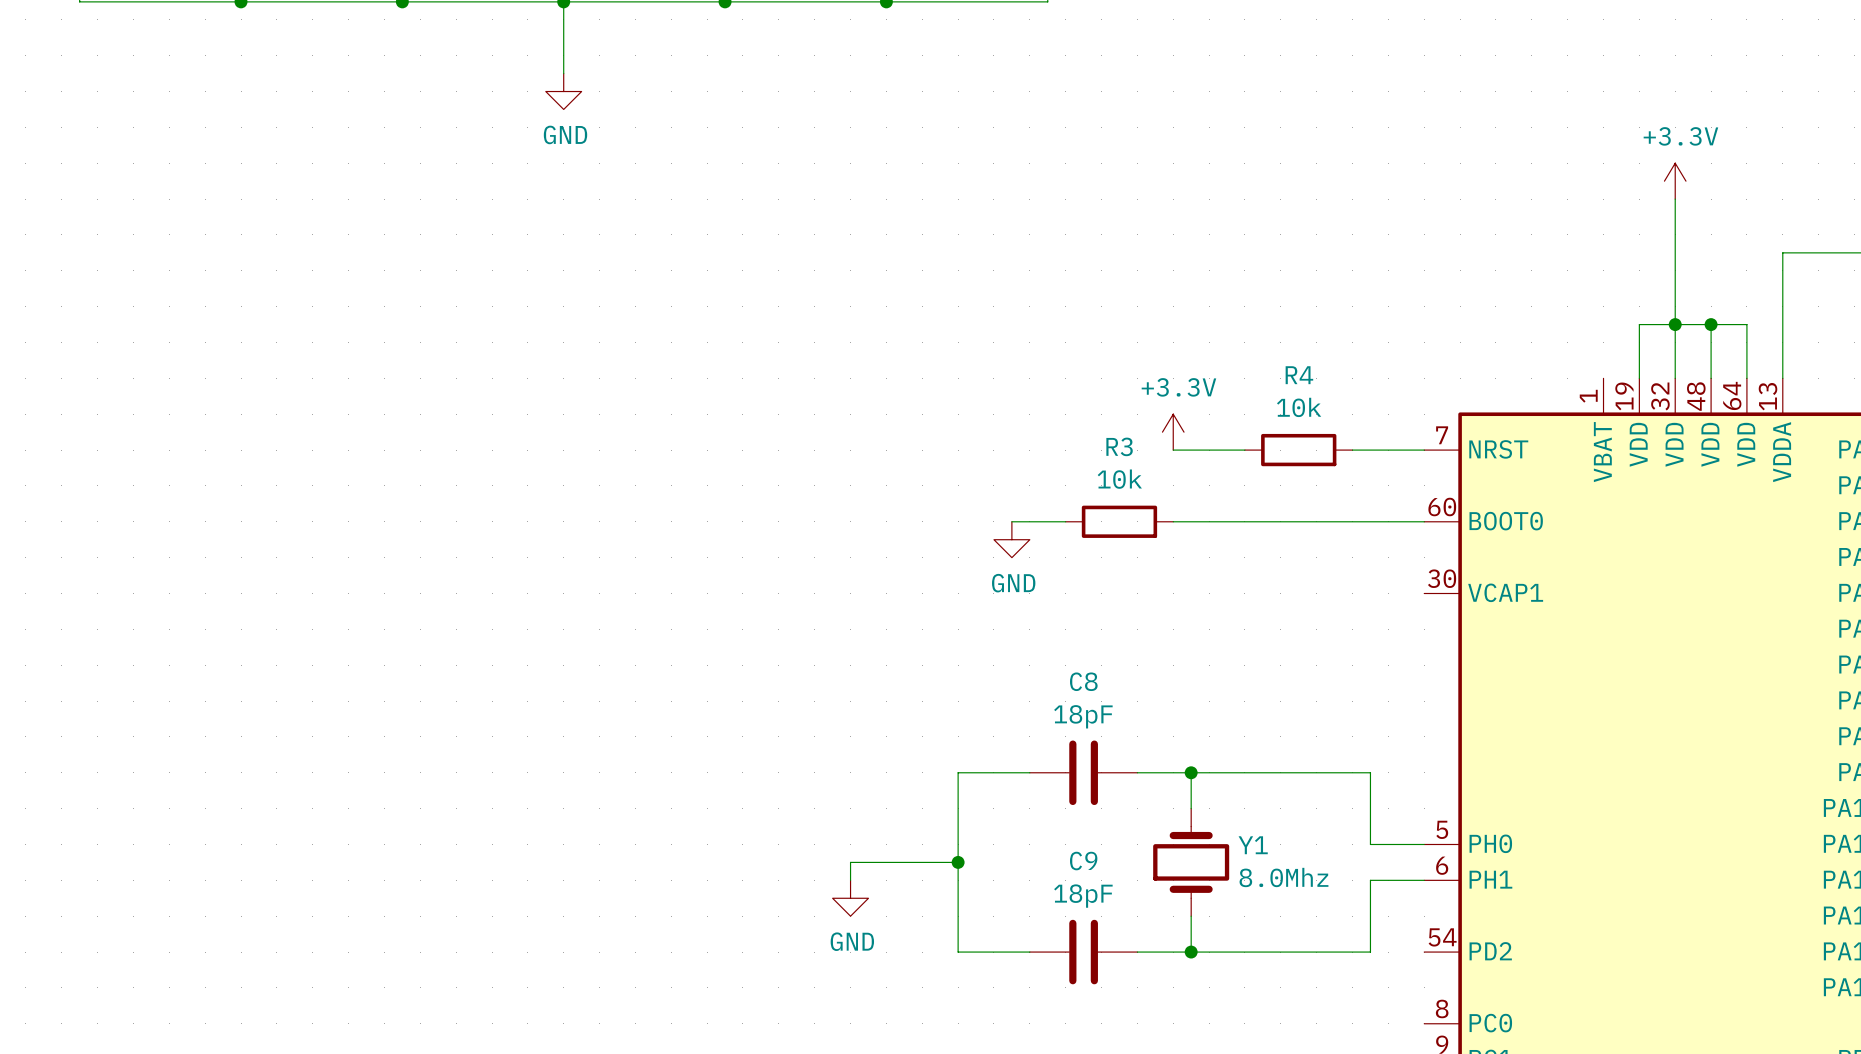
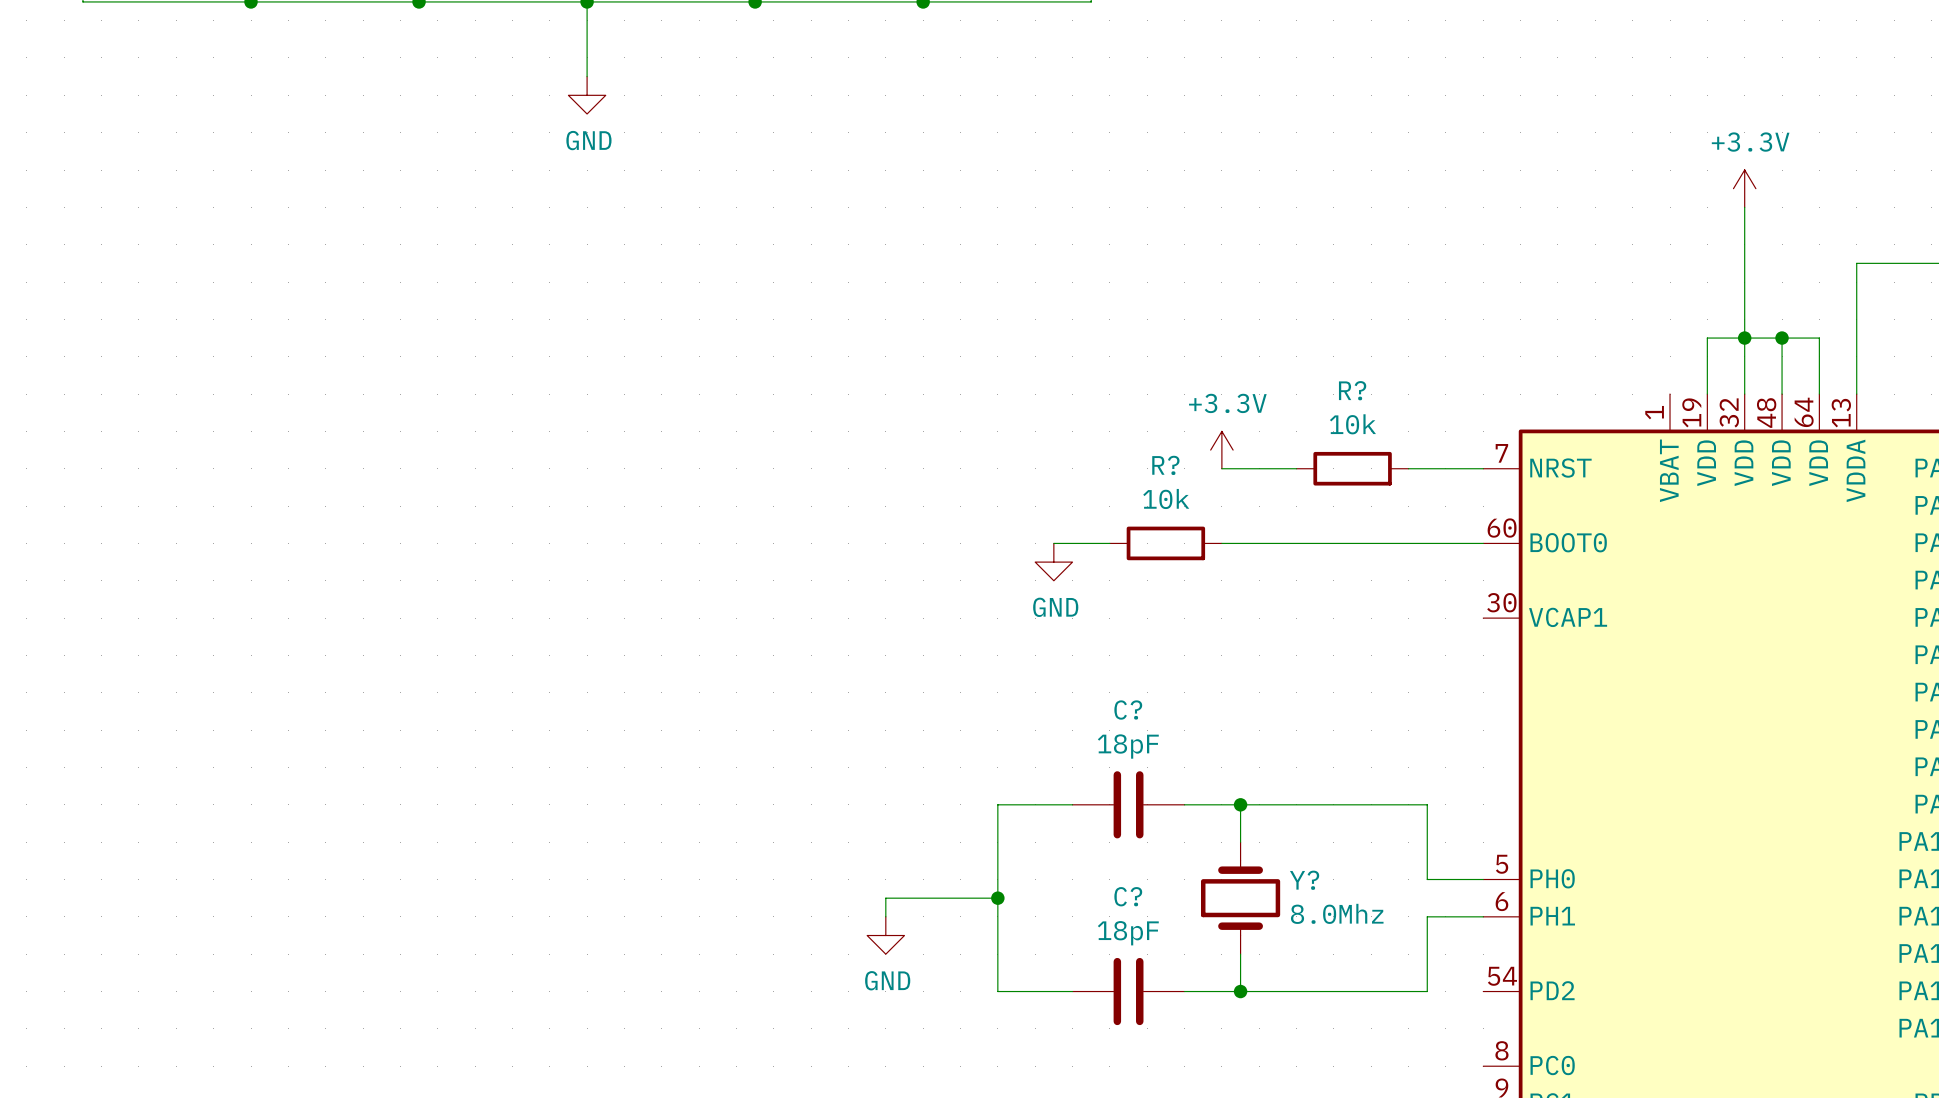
R4 name: R4 (1299, 375) -> R? (1352, 390)
R3 name: R3 (1119, 446) -> R? (1165, 465)
C8 name: C8 (1083, 681) -> C? (1128, 710)
Y1 name: Y1 (1253, 845) -> Y? (1304, 880)
C9 name: C9 (1083, 861) -> C? (1128, 896)

